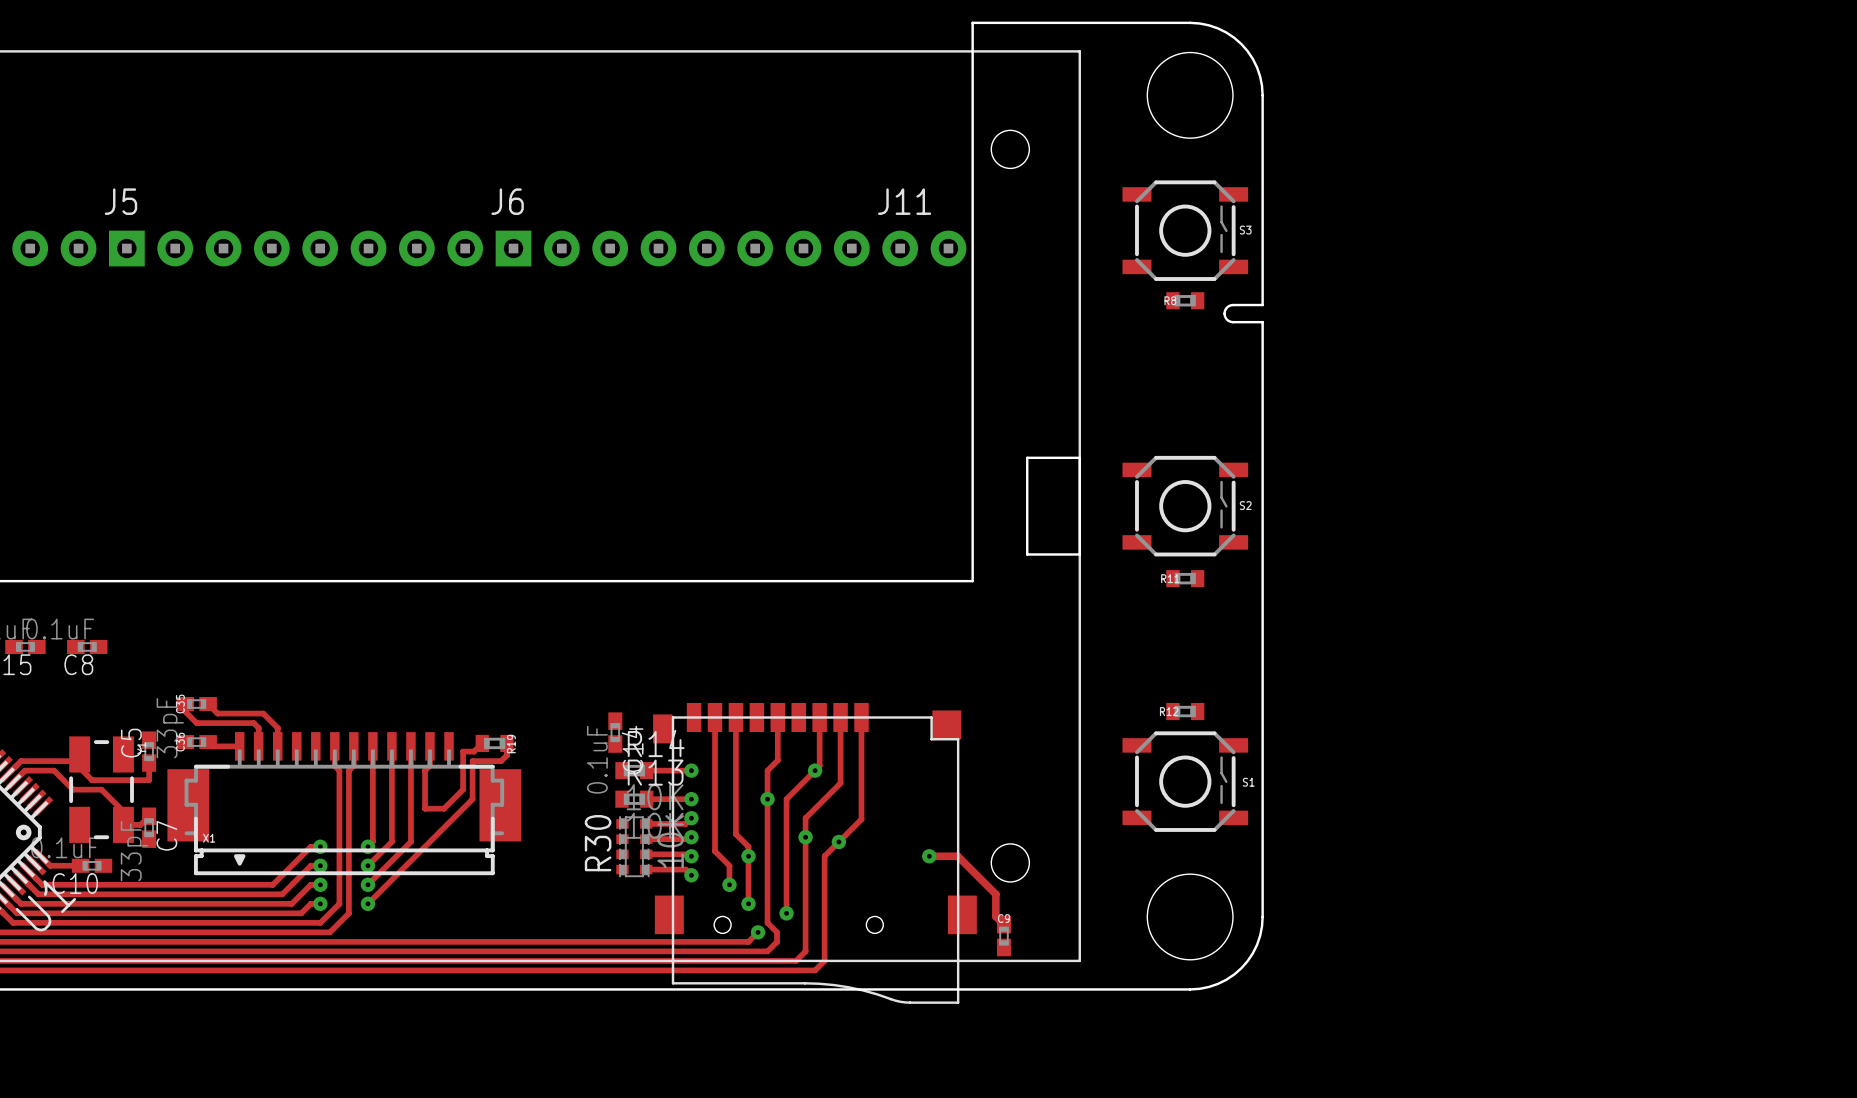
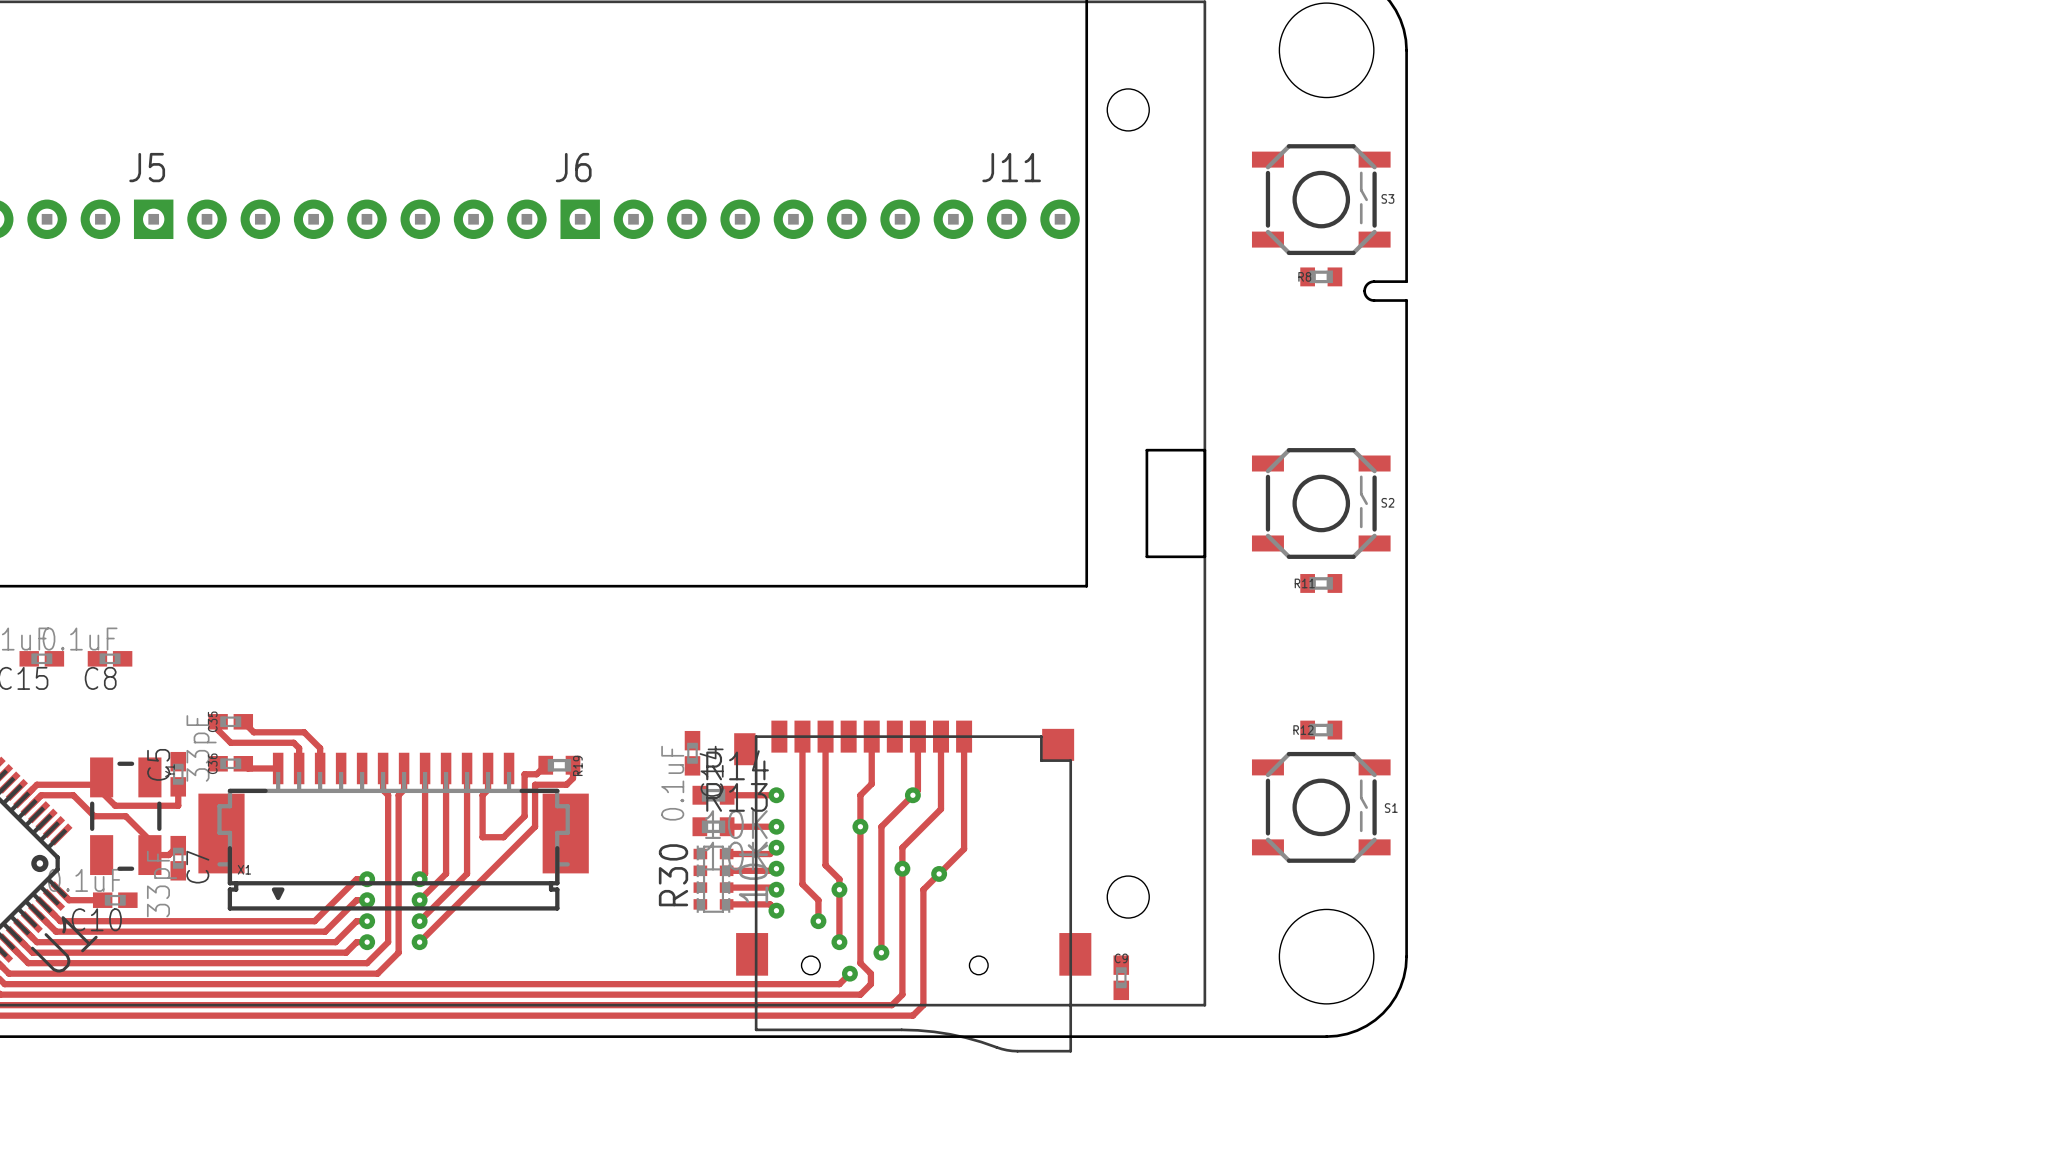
track: (929, 856) (957, 856) (995, 894) (995, 916) (1004, 924) -> none
via: (929, 856) -> none

